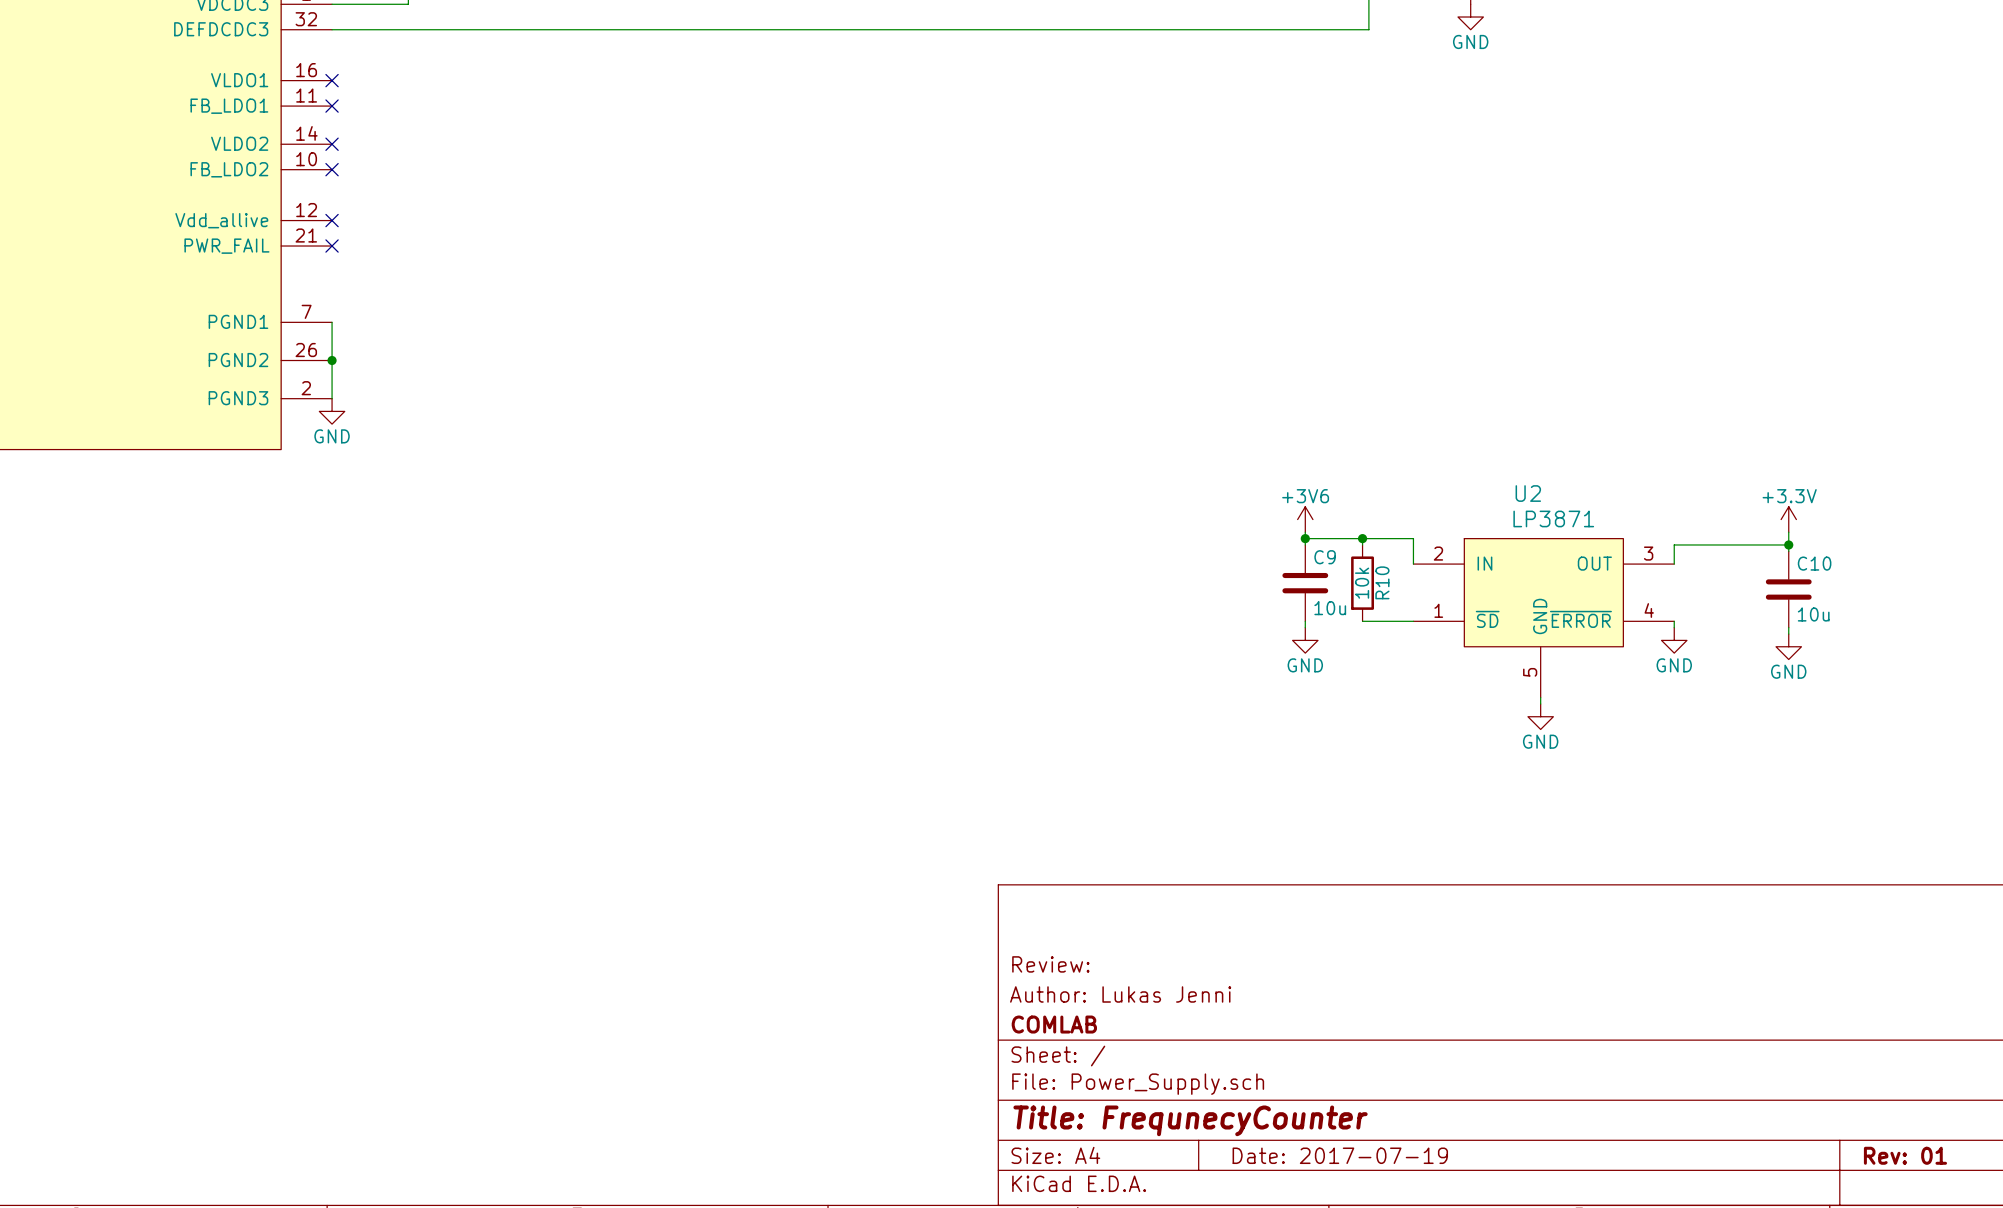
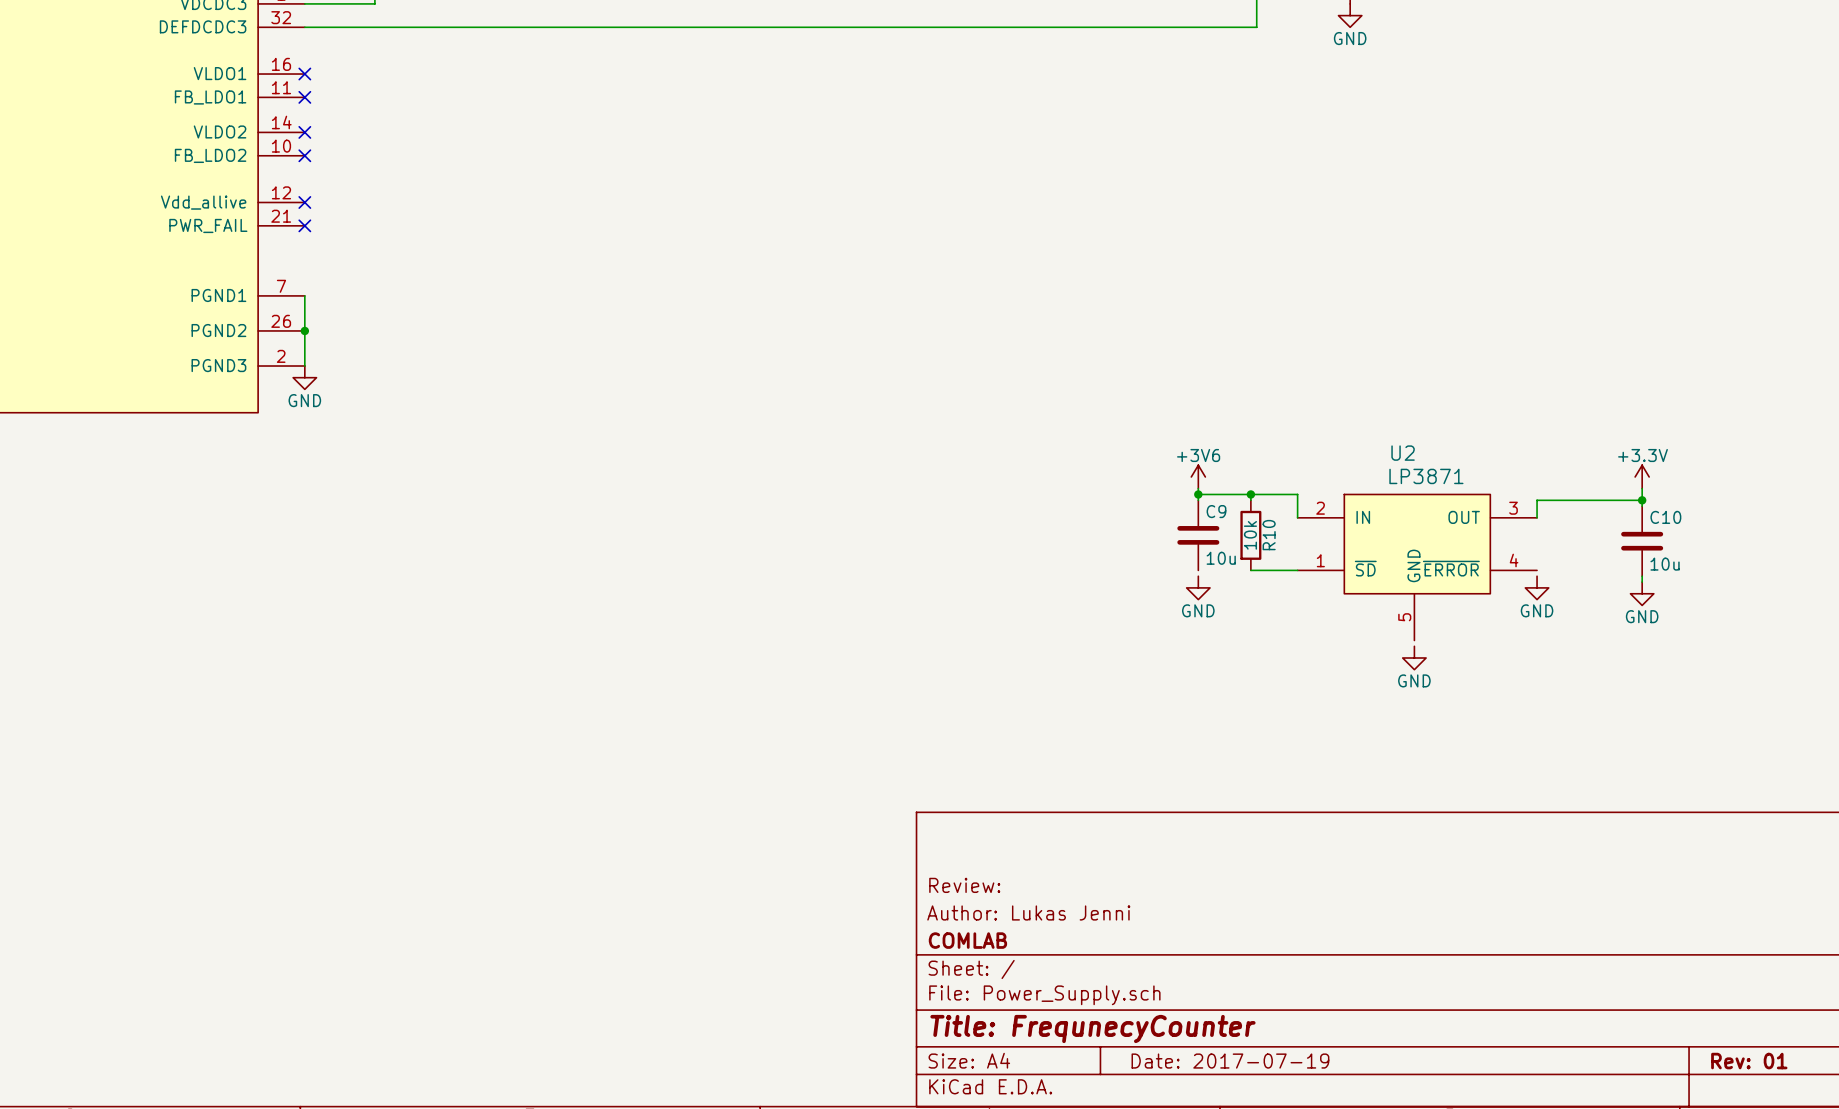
wire: (1305, 621) (1305, 627) -> none
wire: (1674, 621) (1674, 627) -> none
wire: (1540, 697) (1540, 704) -> none

